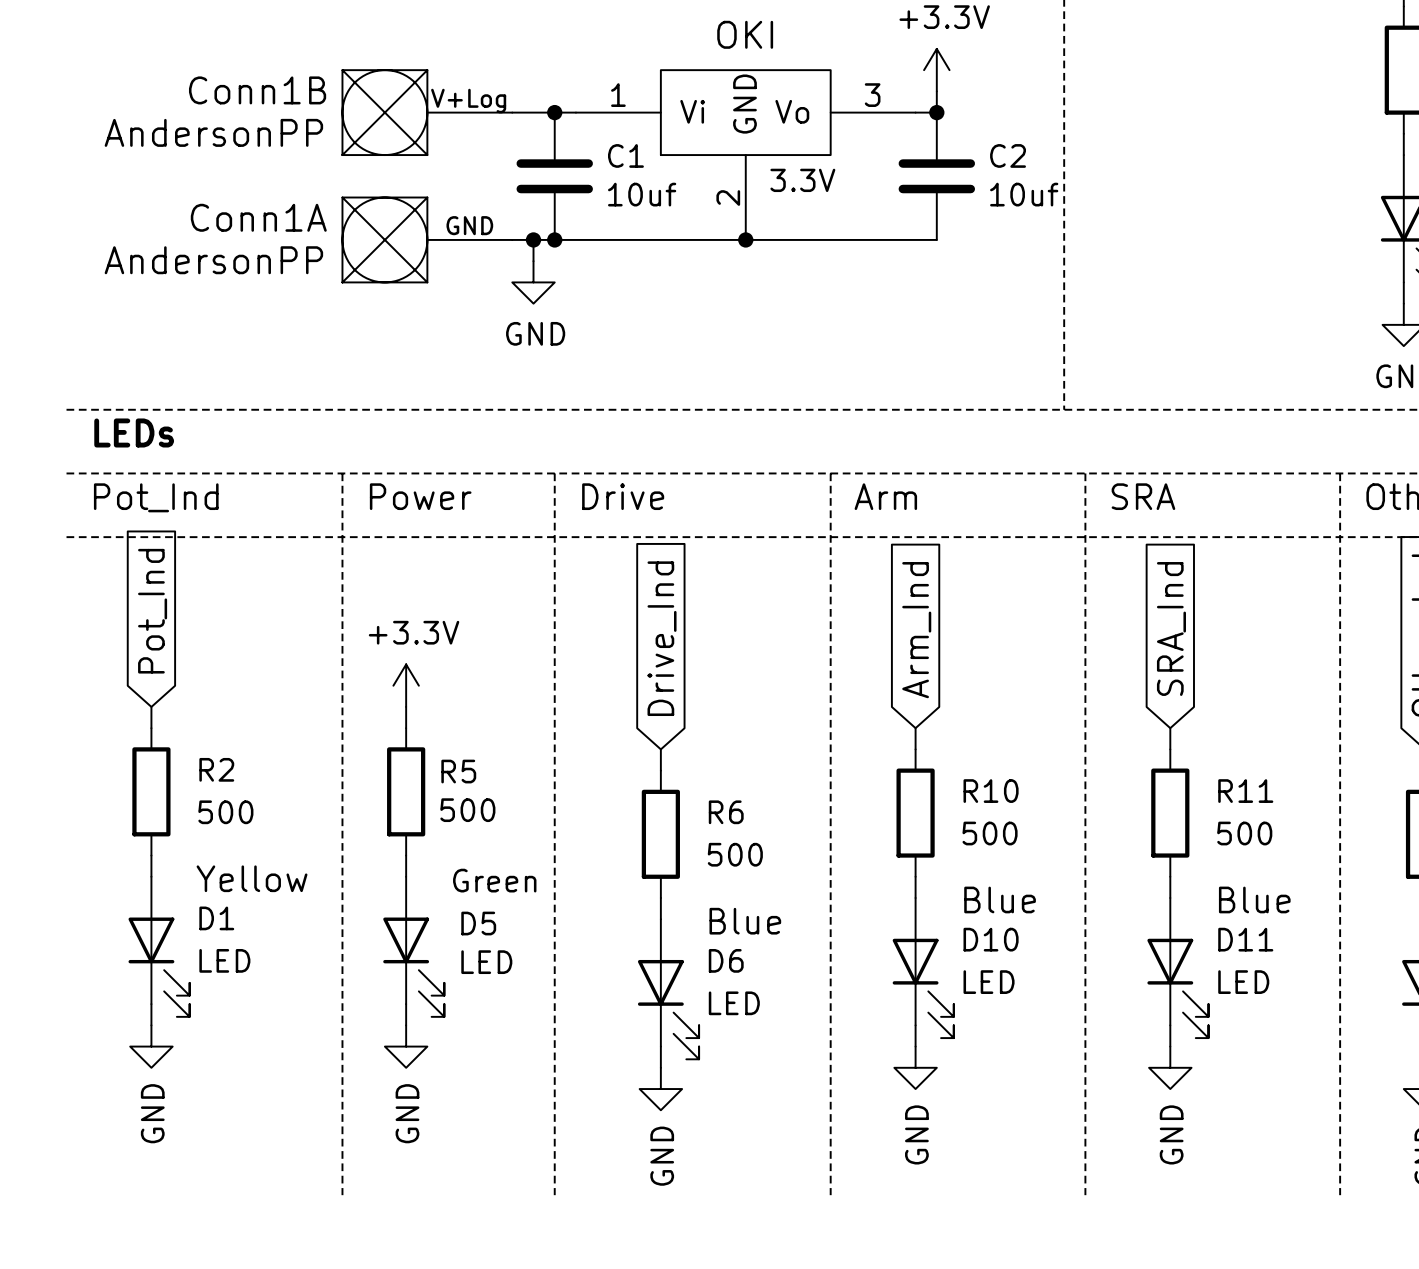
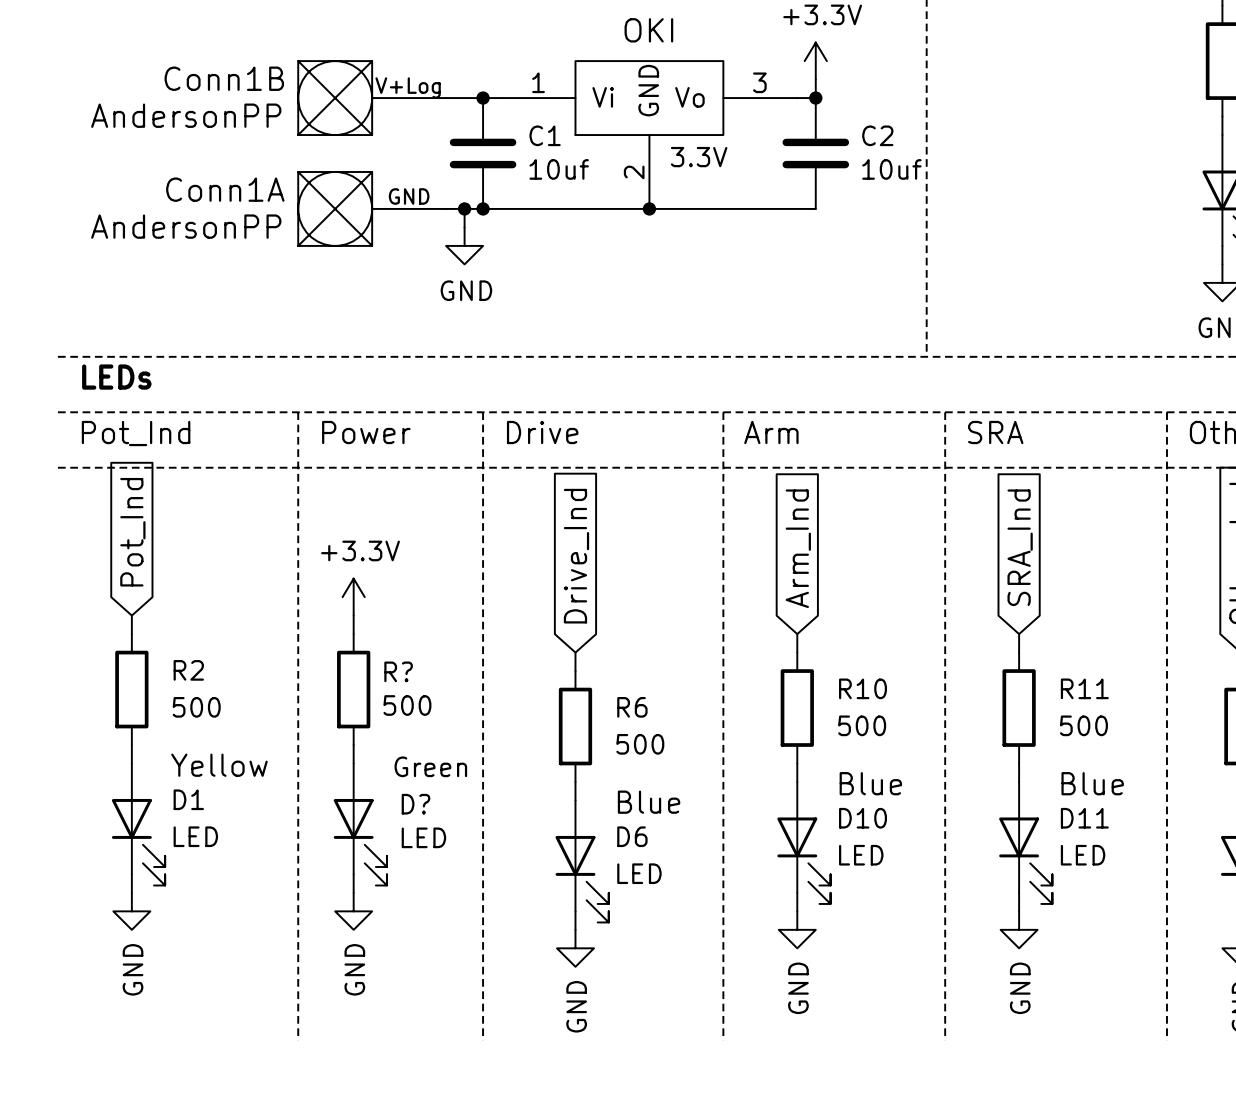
R5 name: R5 (458, 771) -> R? (398, 671)
D5 name: D5 (478, 923) -> D? (415, 804)

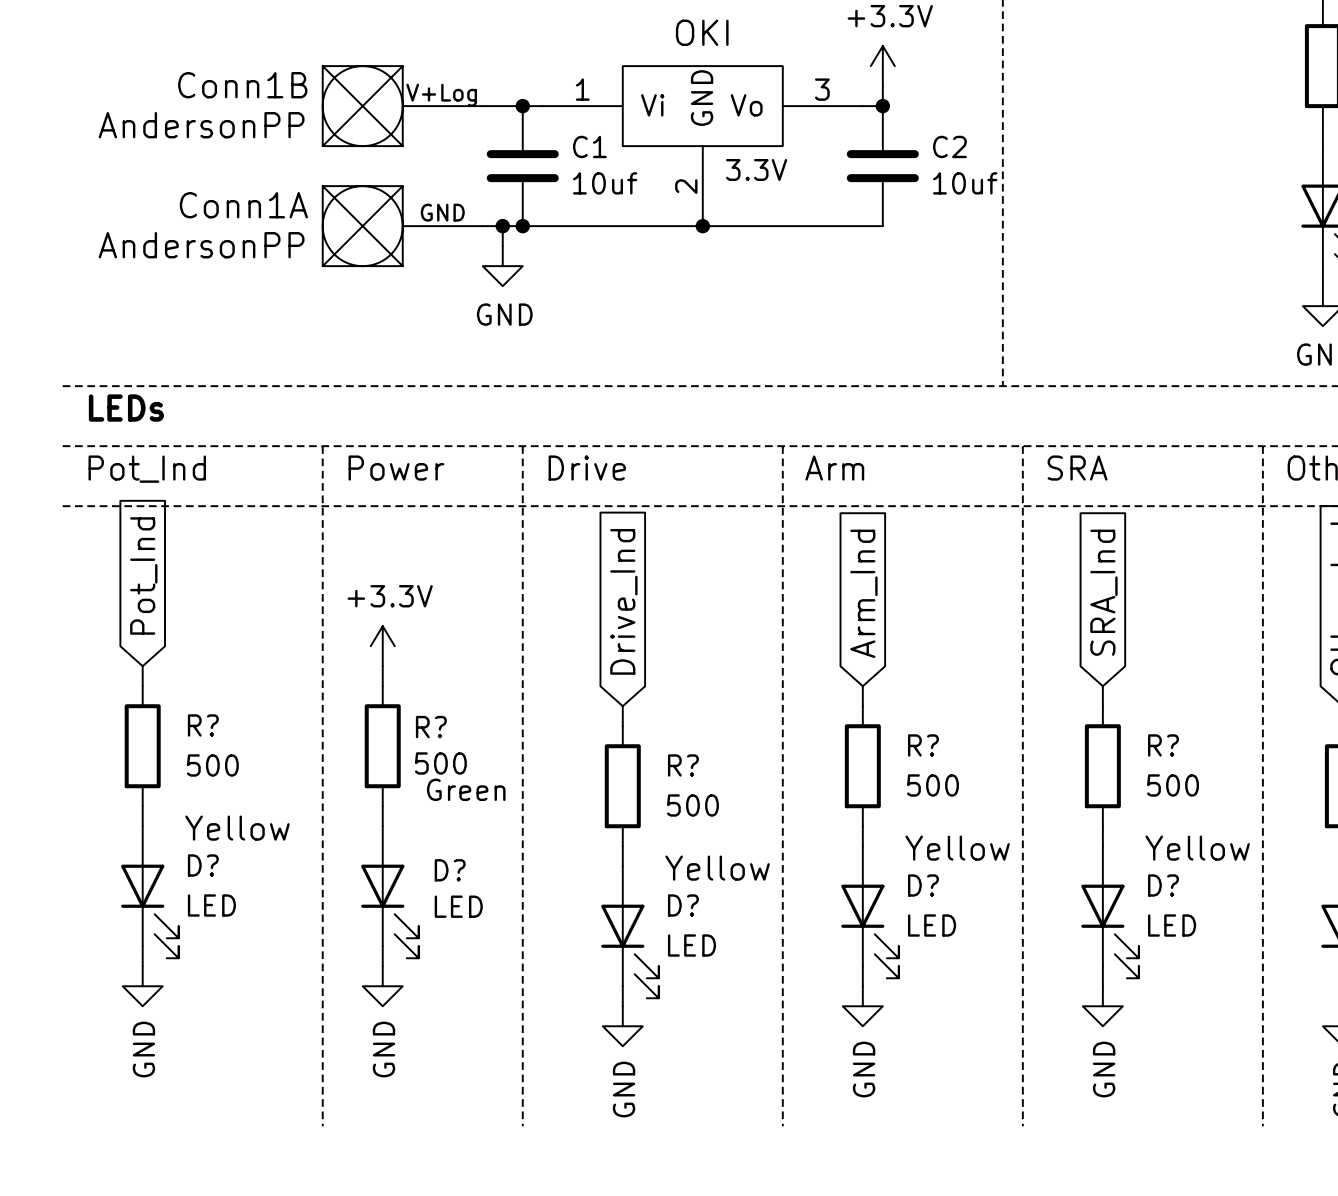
R2 name: R2 (188, 670) -> R? (203, 725)
R10 name: R10 (863, 688) -> R? (923, 745)
R11 name: R11 (1084, 688) -> R? (1163, 745)
R6 name: R6 (632, 707) -> R? (683, 765)
text position: Green (430, 766) -> Green (466, 789)
text: Blue (870, 783) -> Yellow (957, 848)
text: Blue (1092, 783) -> Yellow (1197, 848)
D1 name: D1 (188, 799) -> D? (203, 865)
text: Blue (649, 802) -> Yellow (717, 868)
D10 name: D10 (863, 818) -> D? (923, 885)
D11 name: D11 (1084, 818) -> D? (1163, 885)
D6 name: D6 (632, 836) -> D? (683, 905)

